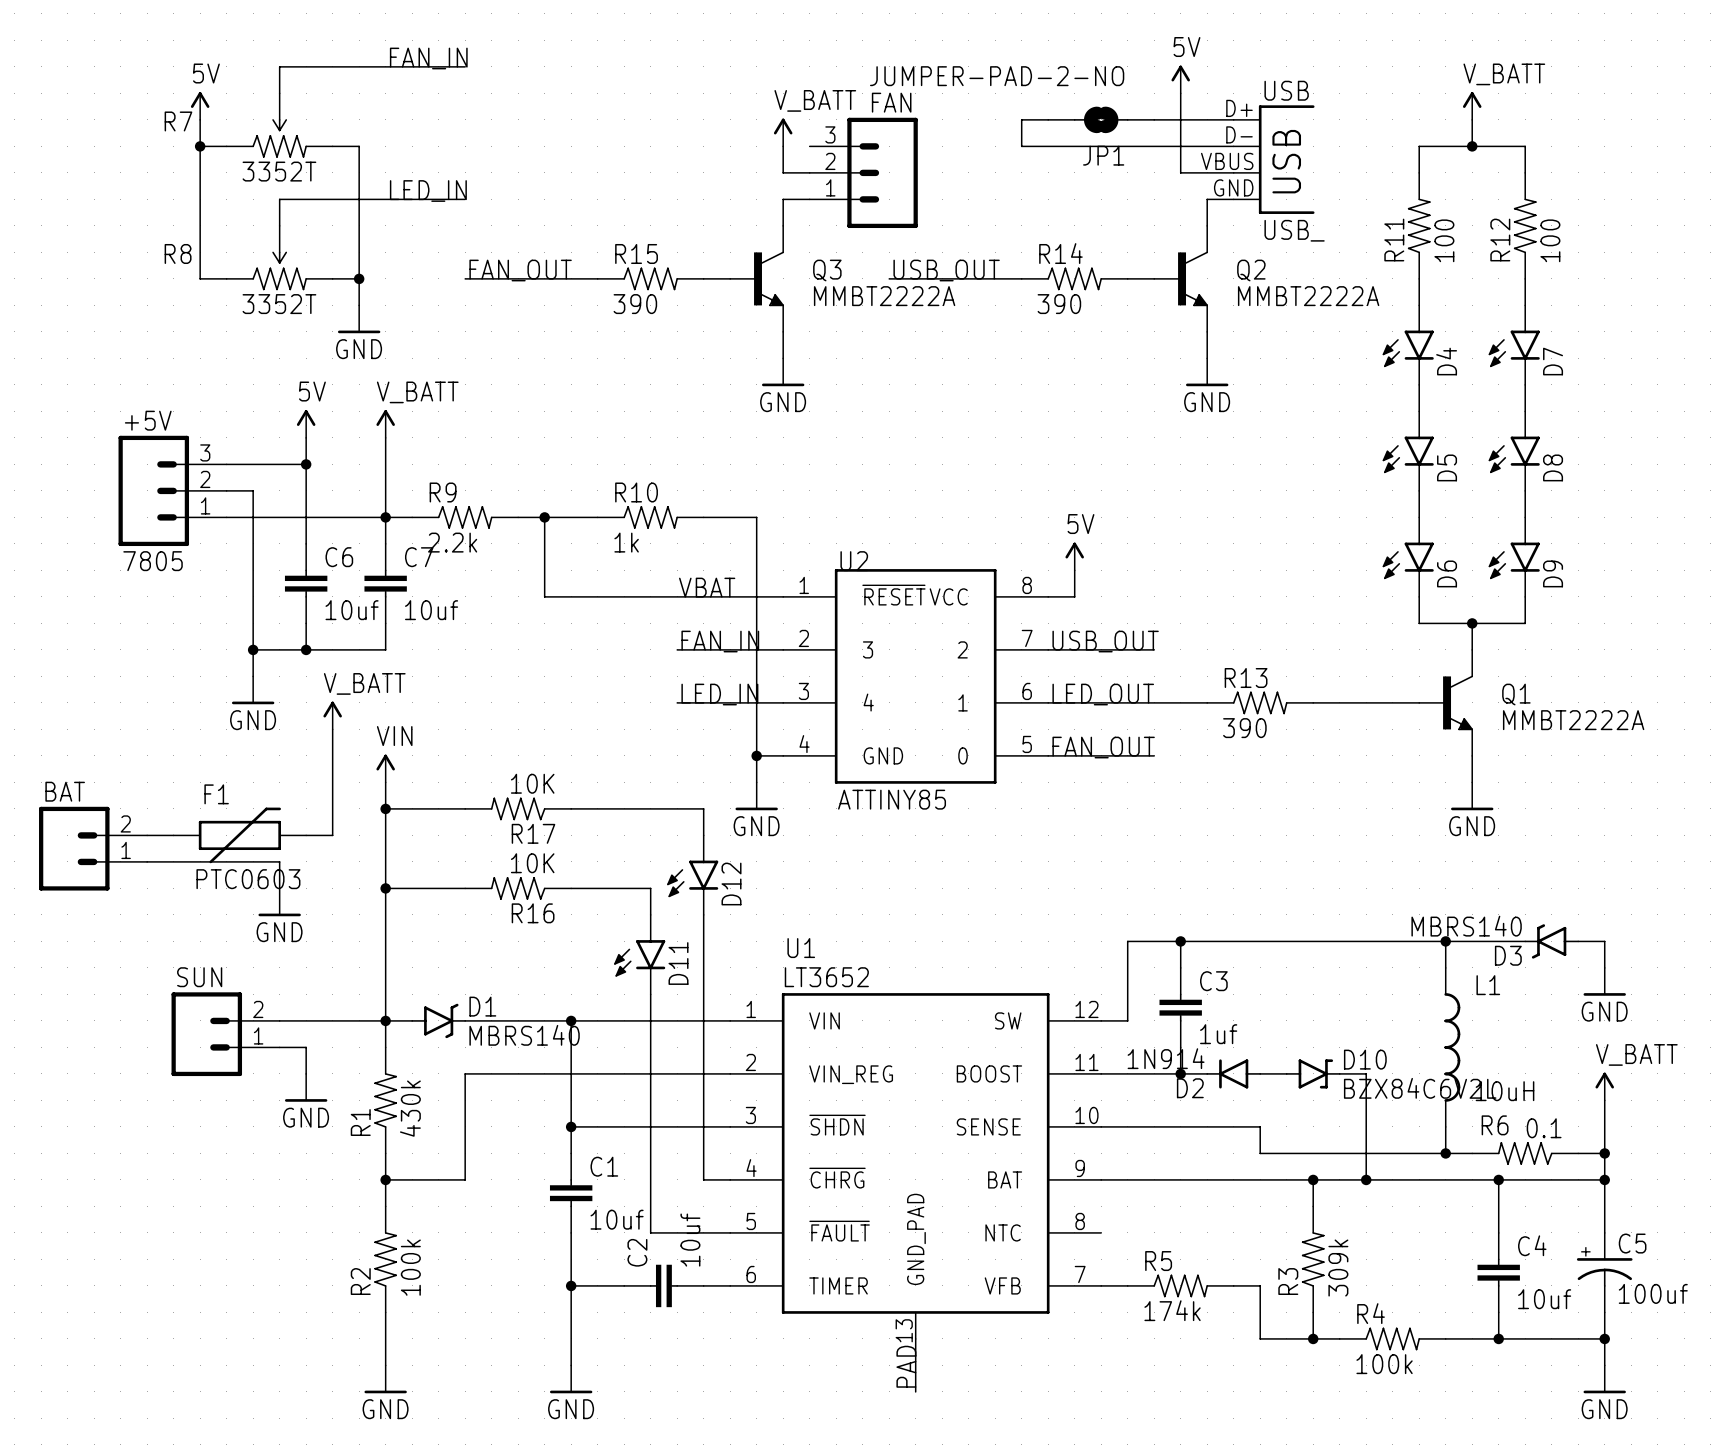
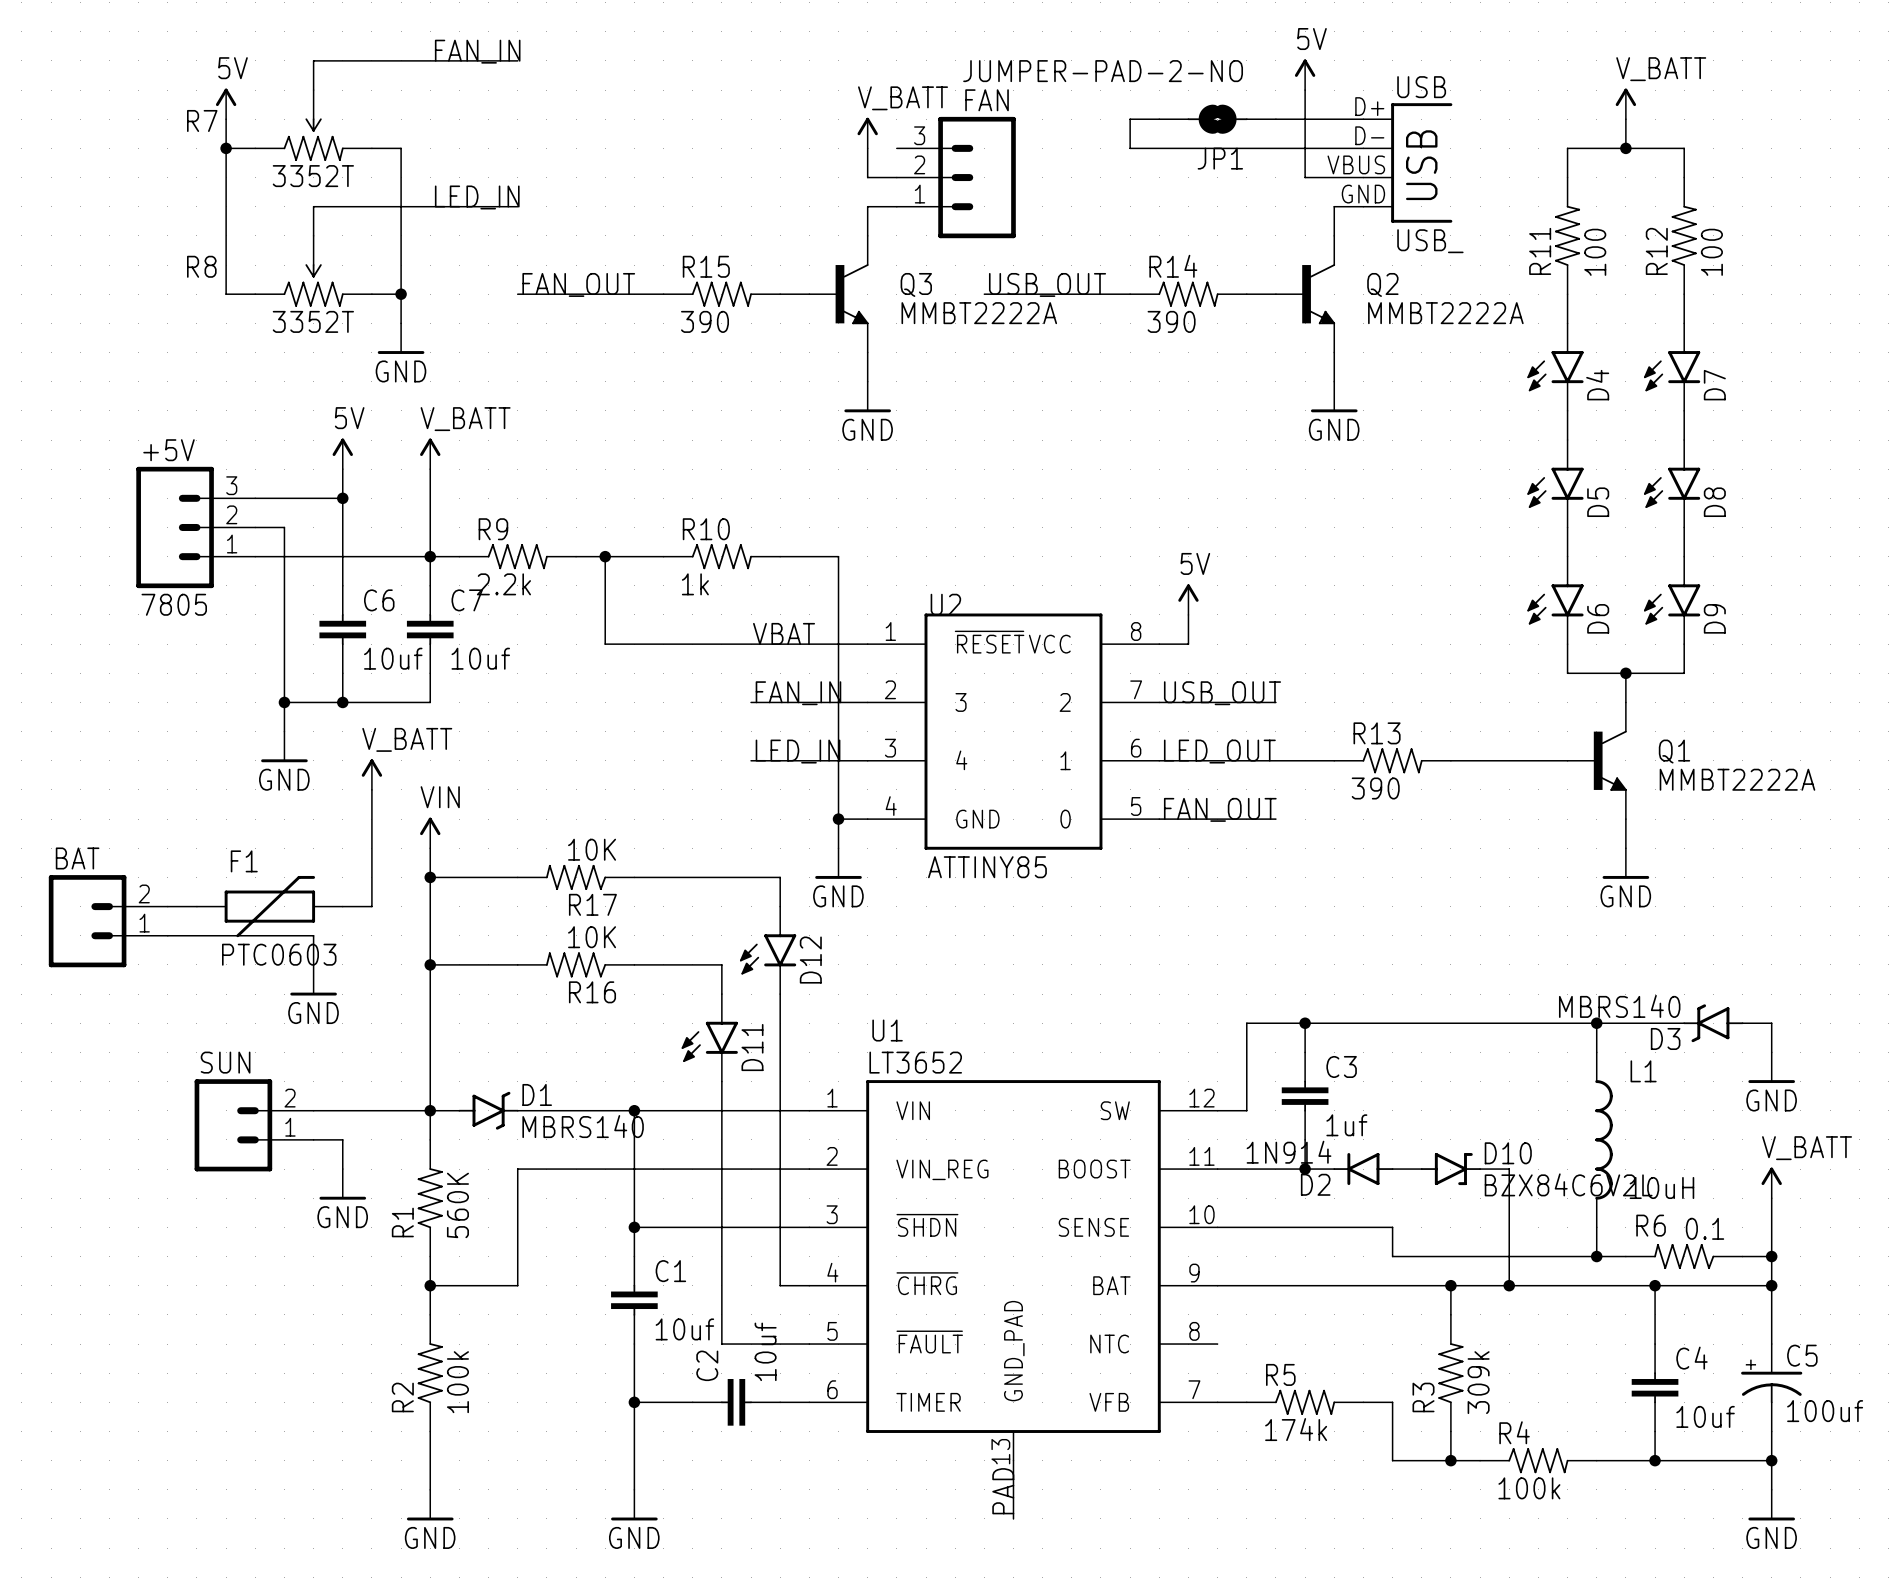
R1 value: 430k (410, 1108) -> 560K (457, 1205)

